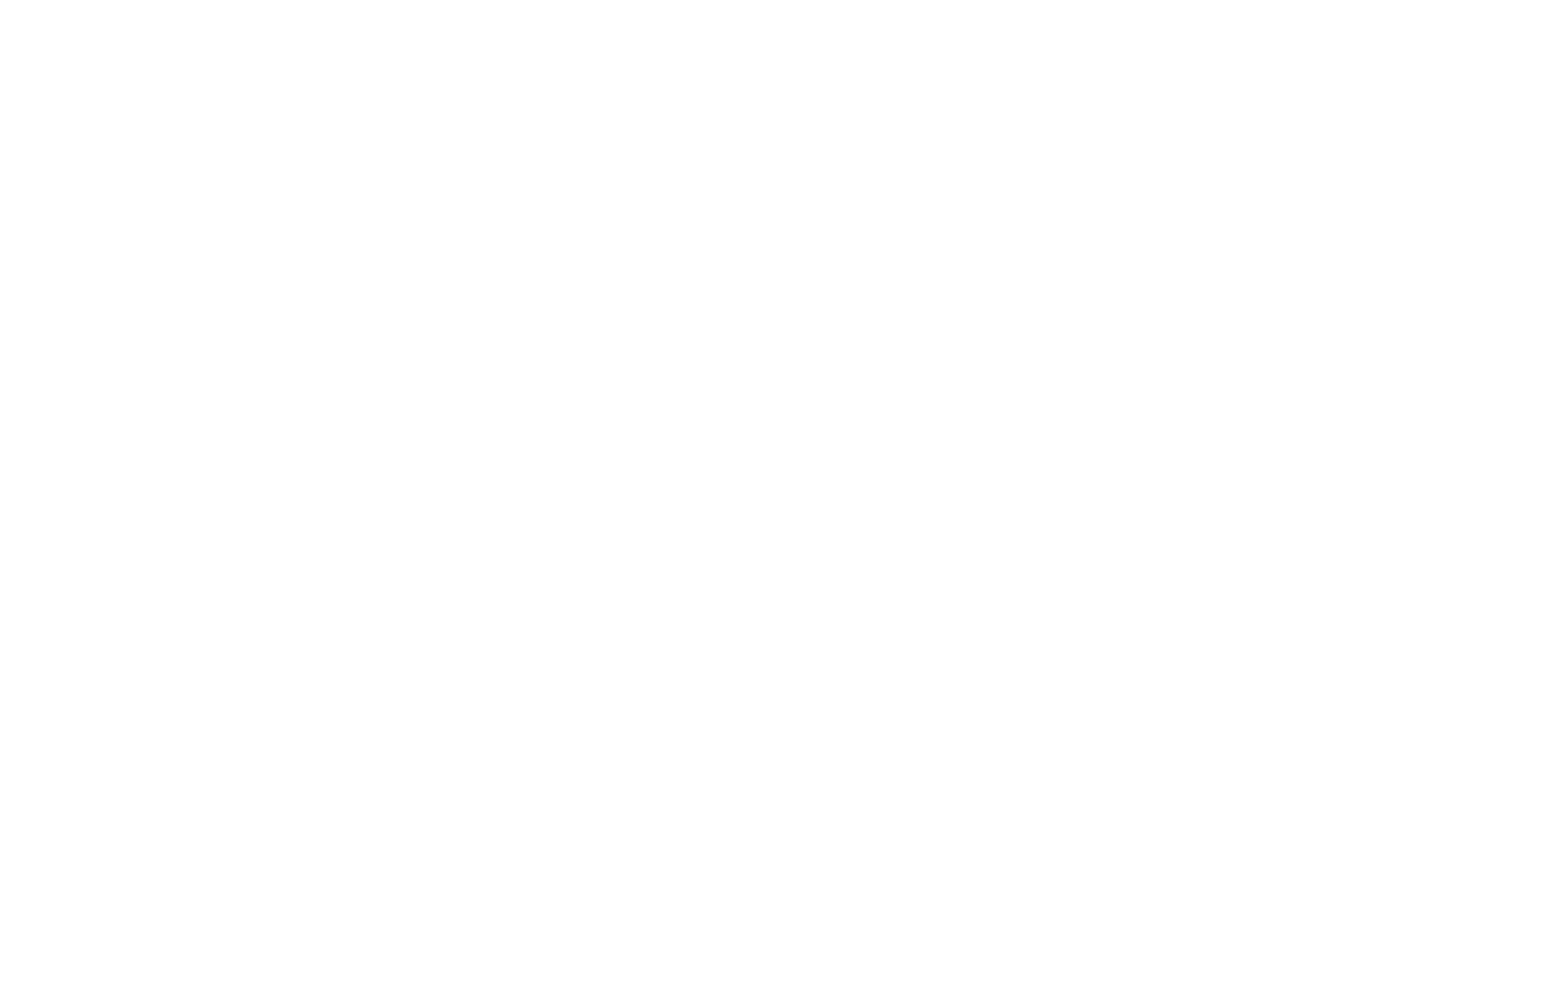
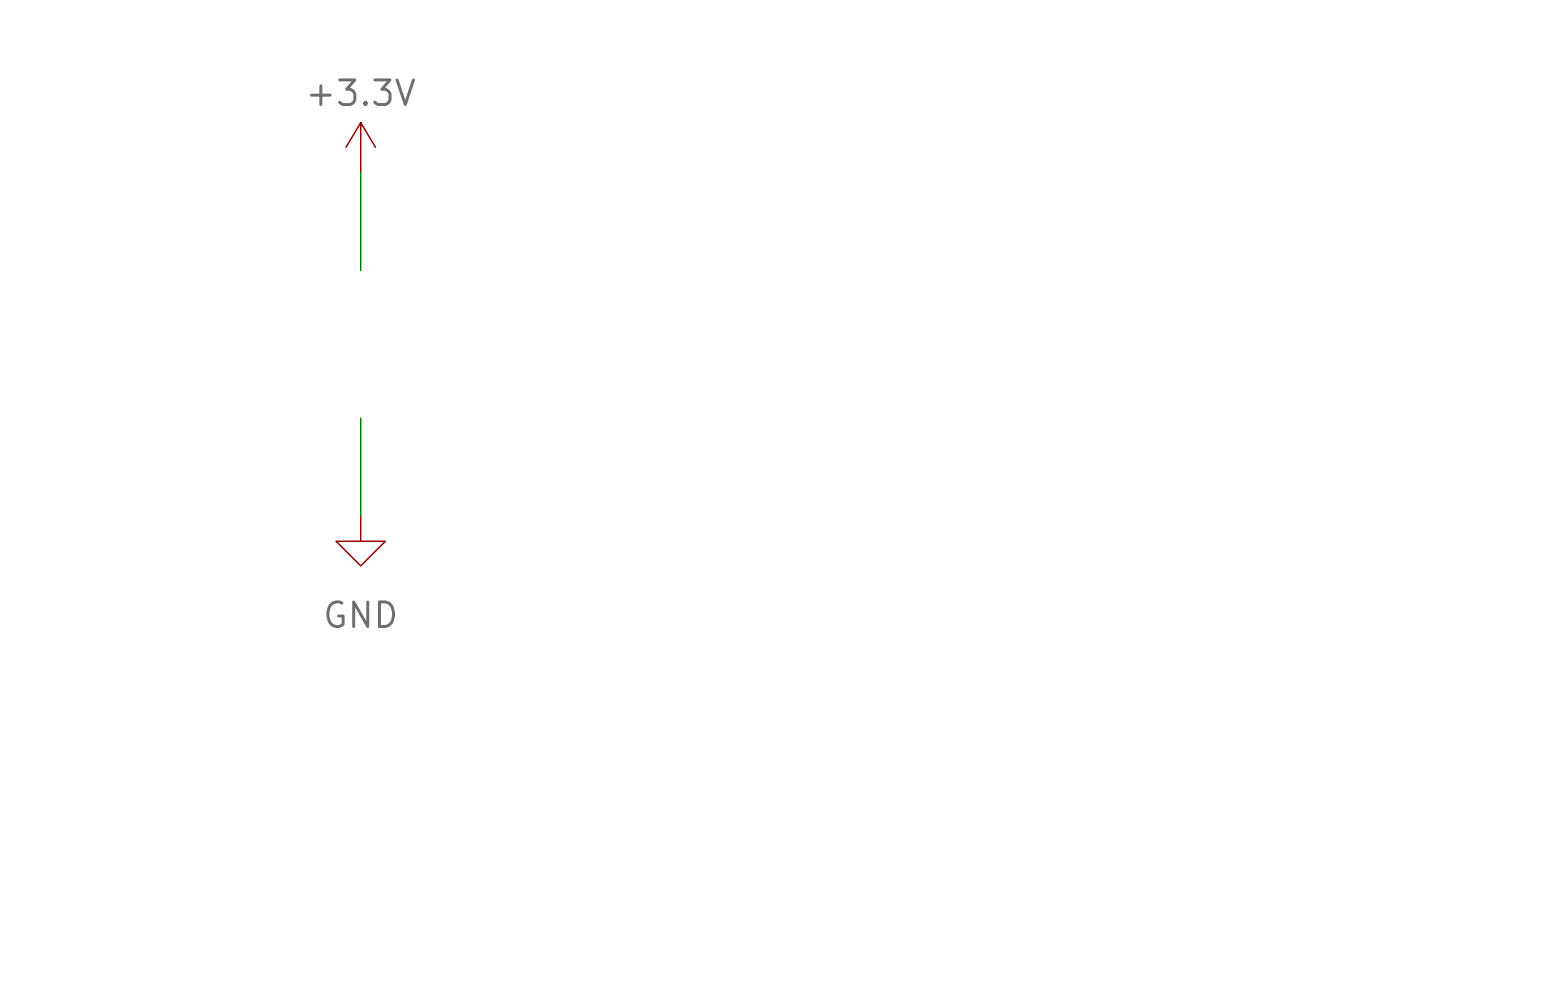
power symbol: none -> +3.3V (360, 147)
wire: none -> (360, 171) (360, 270)
wire: none -> (360, 418) (360, 516)
power symbol: none -> GND (360, 541)

